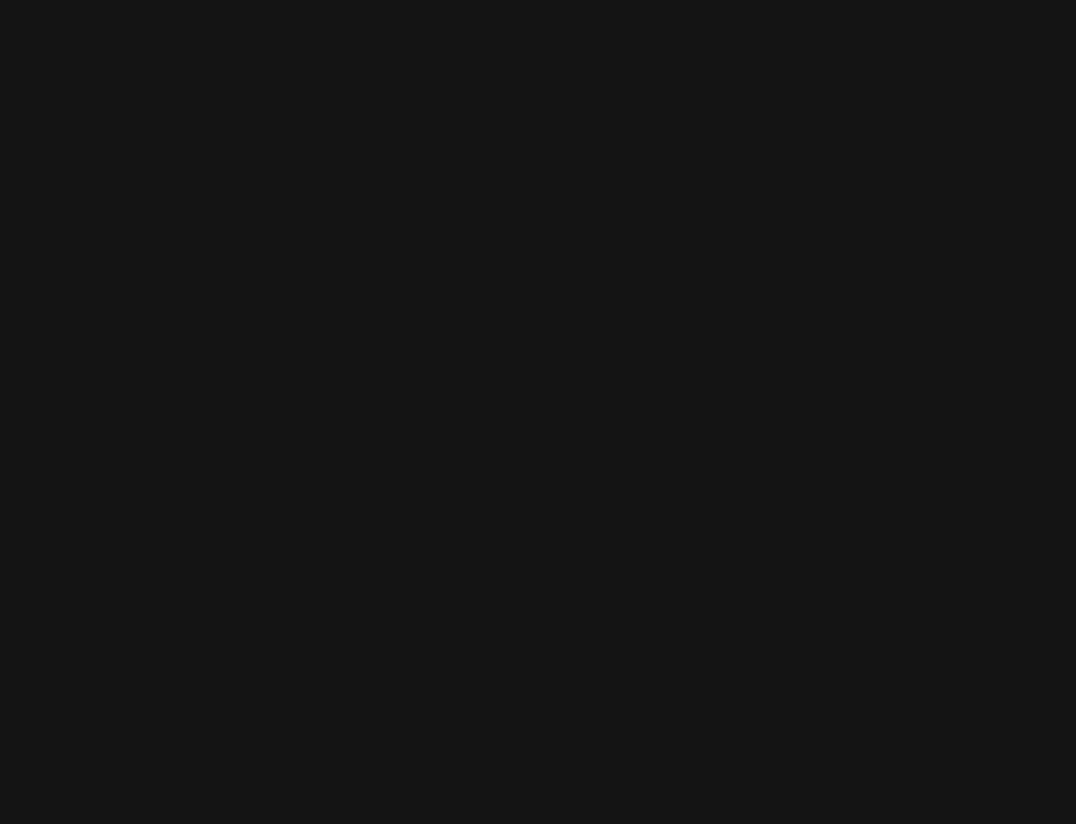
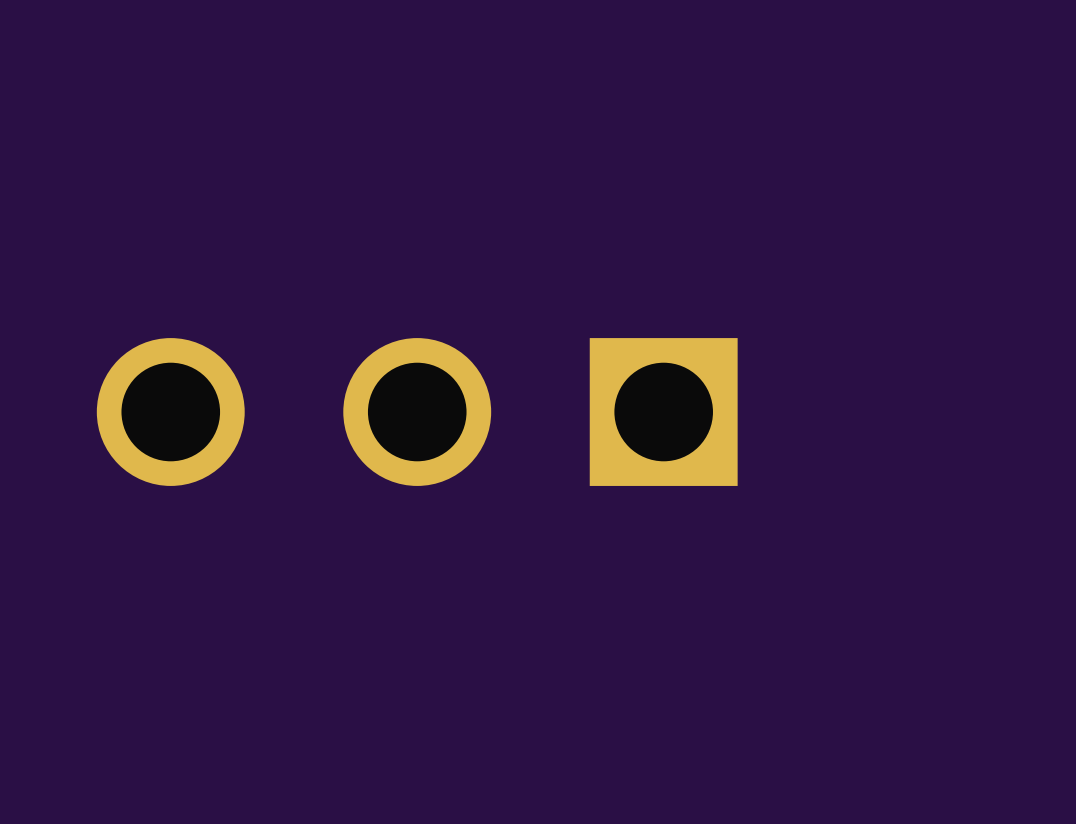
part: none -> (417, 412)

